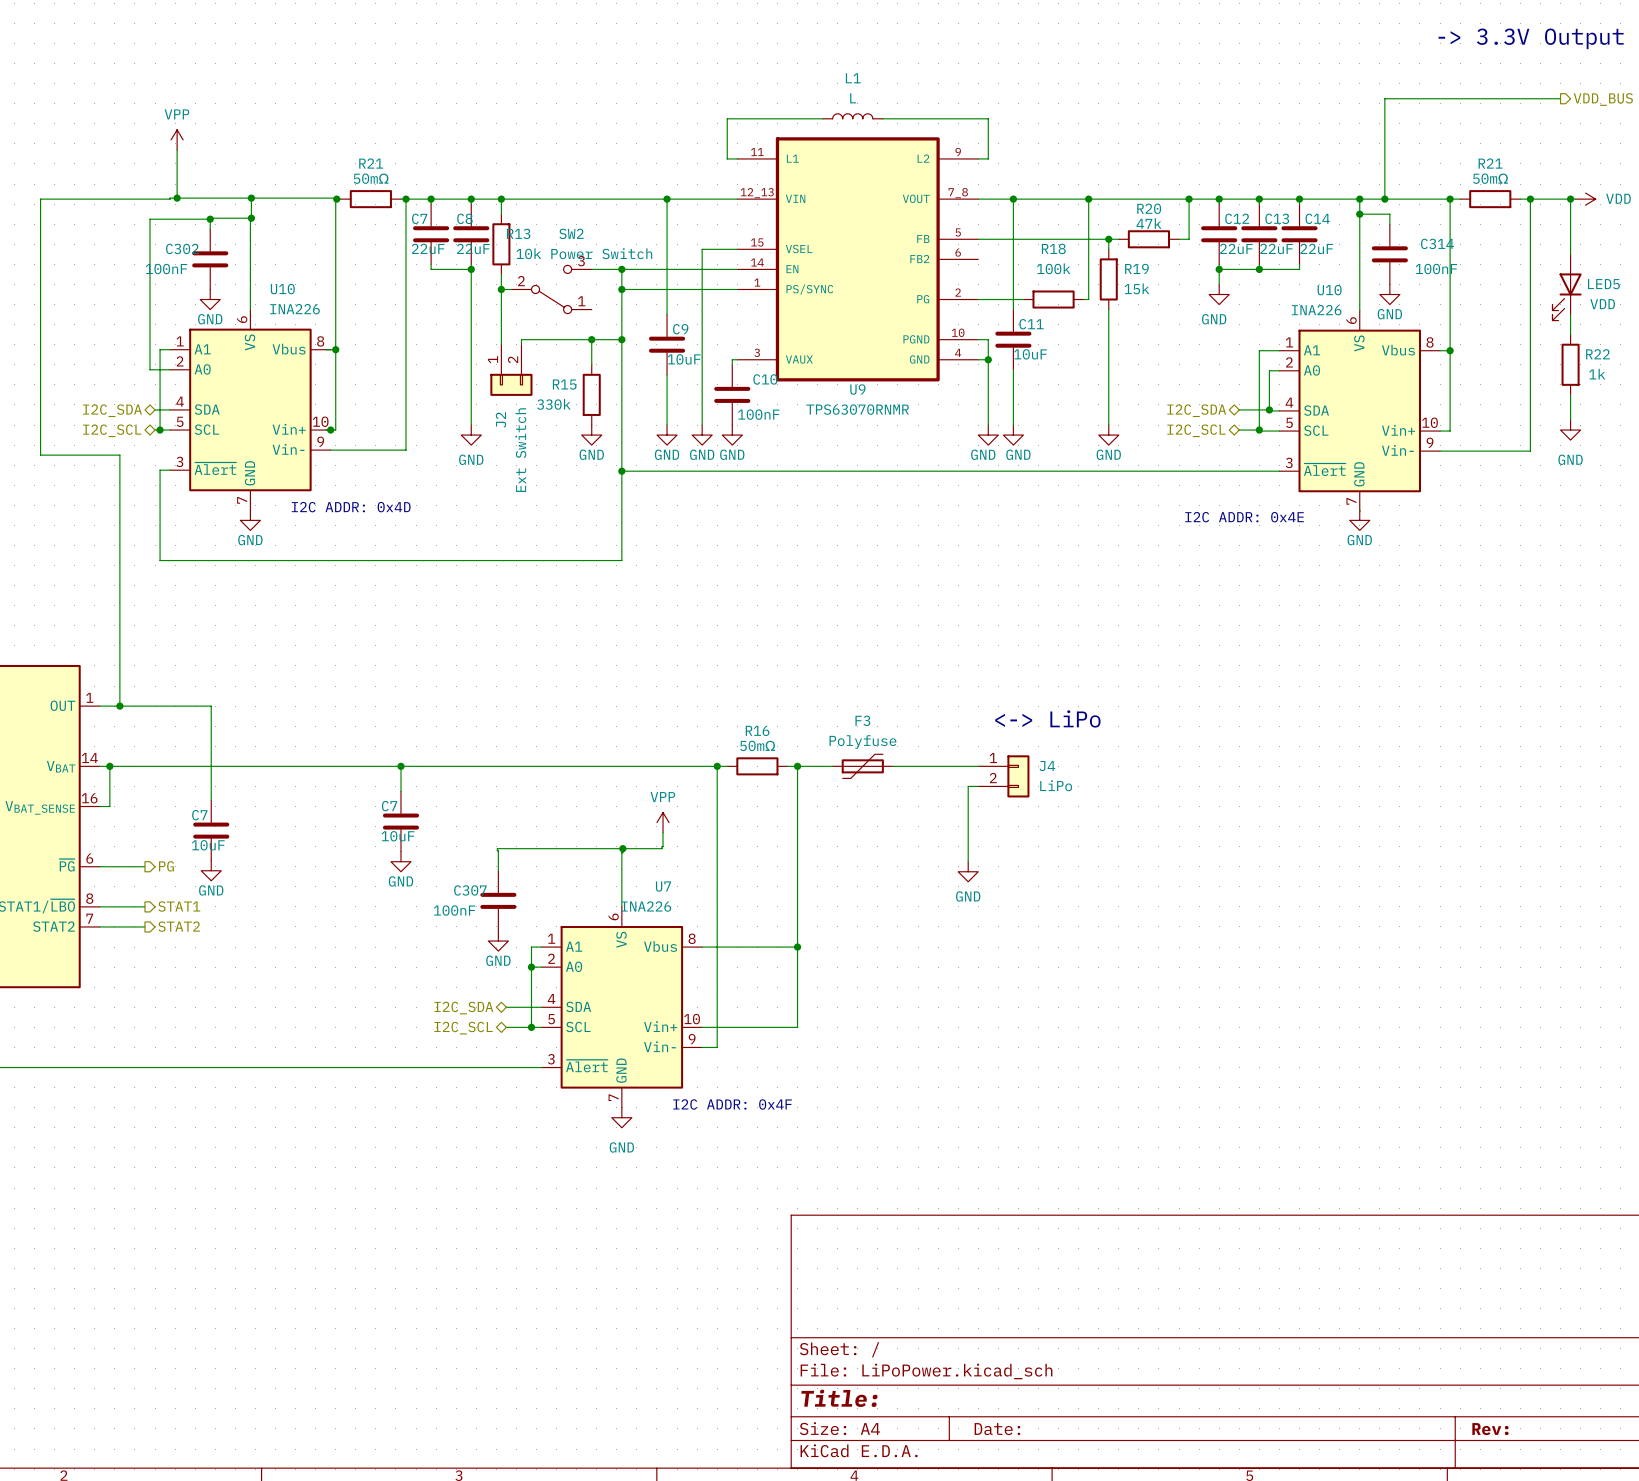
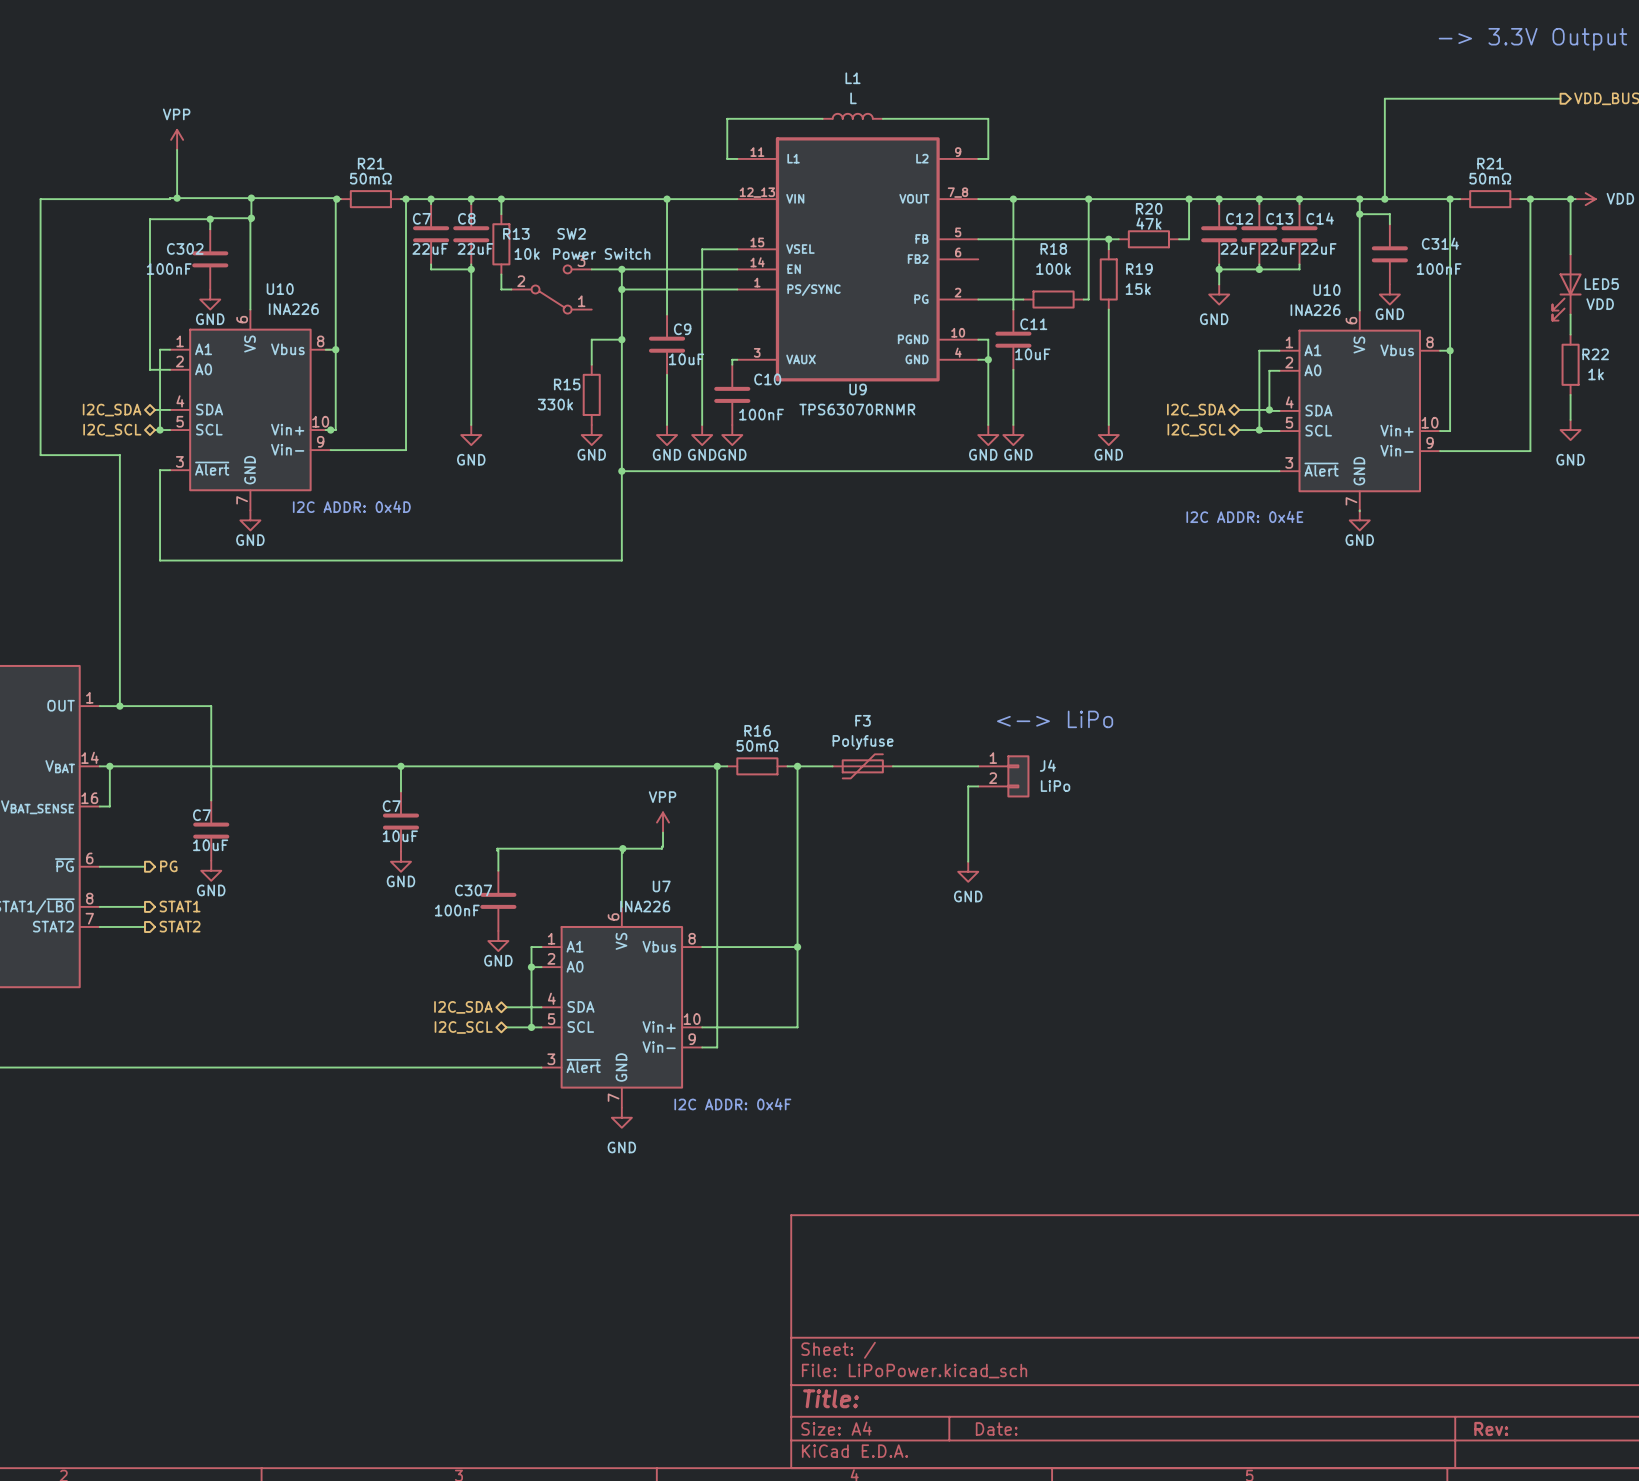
wire: (501, 289) (501, 344) -> none
junction: (501, 289) -> none
wire: (591, 339) (521, 339) (521, 344) -> none
junction: (591, 339) -> none
J2: Ext Switch (511, 370) -> none

